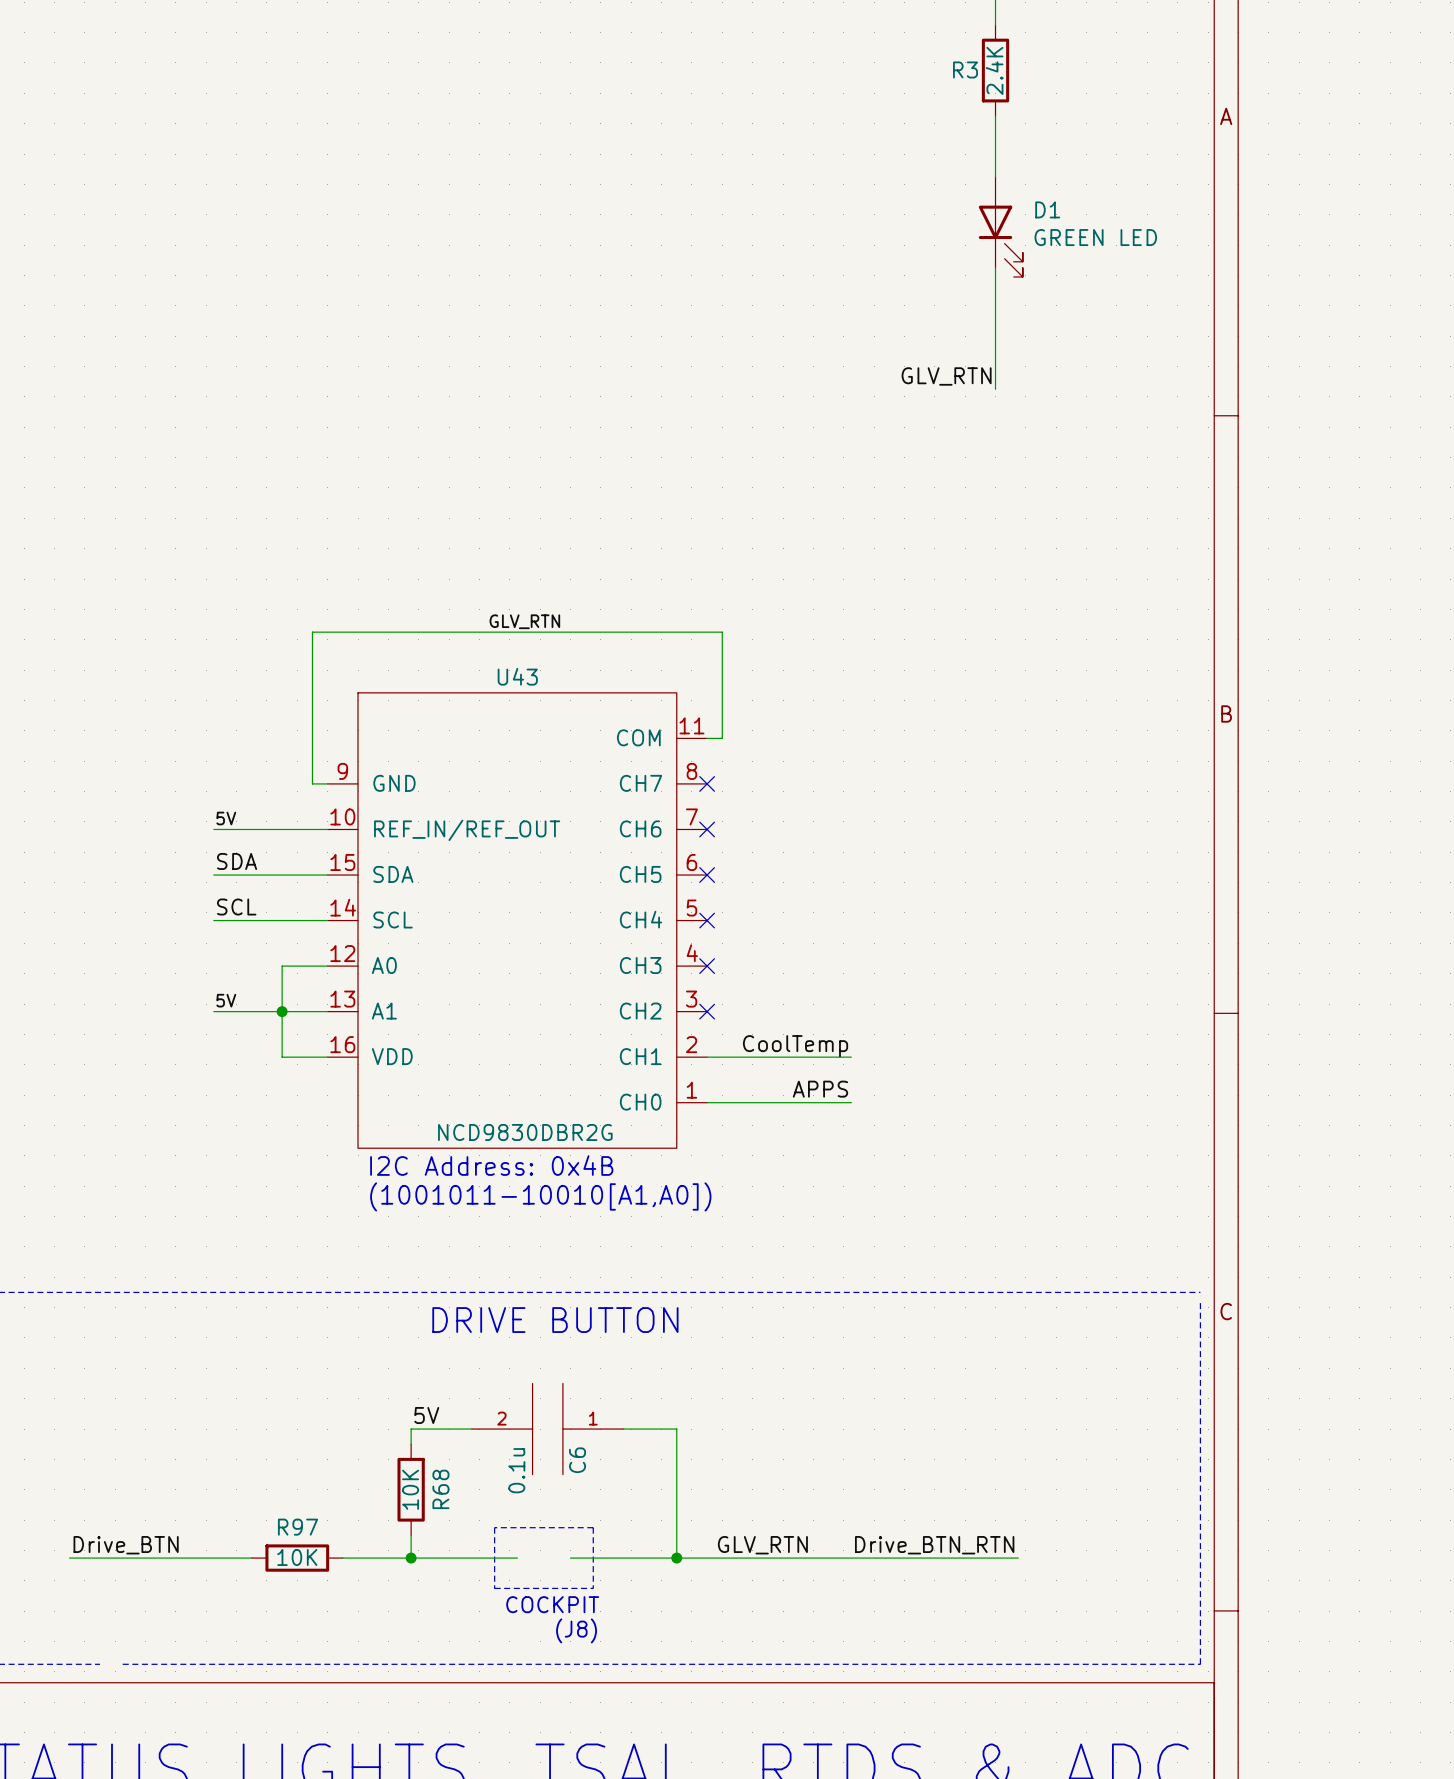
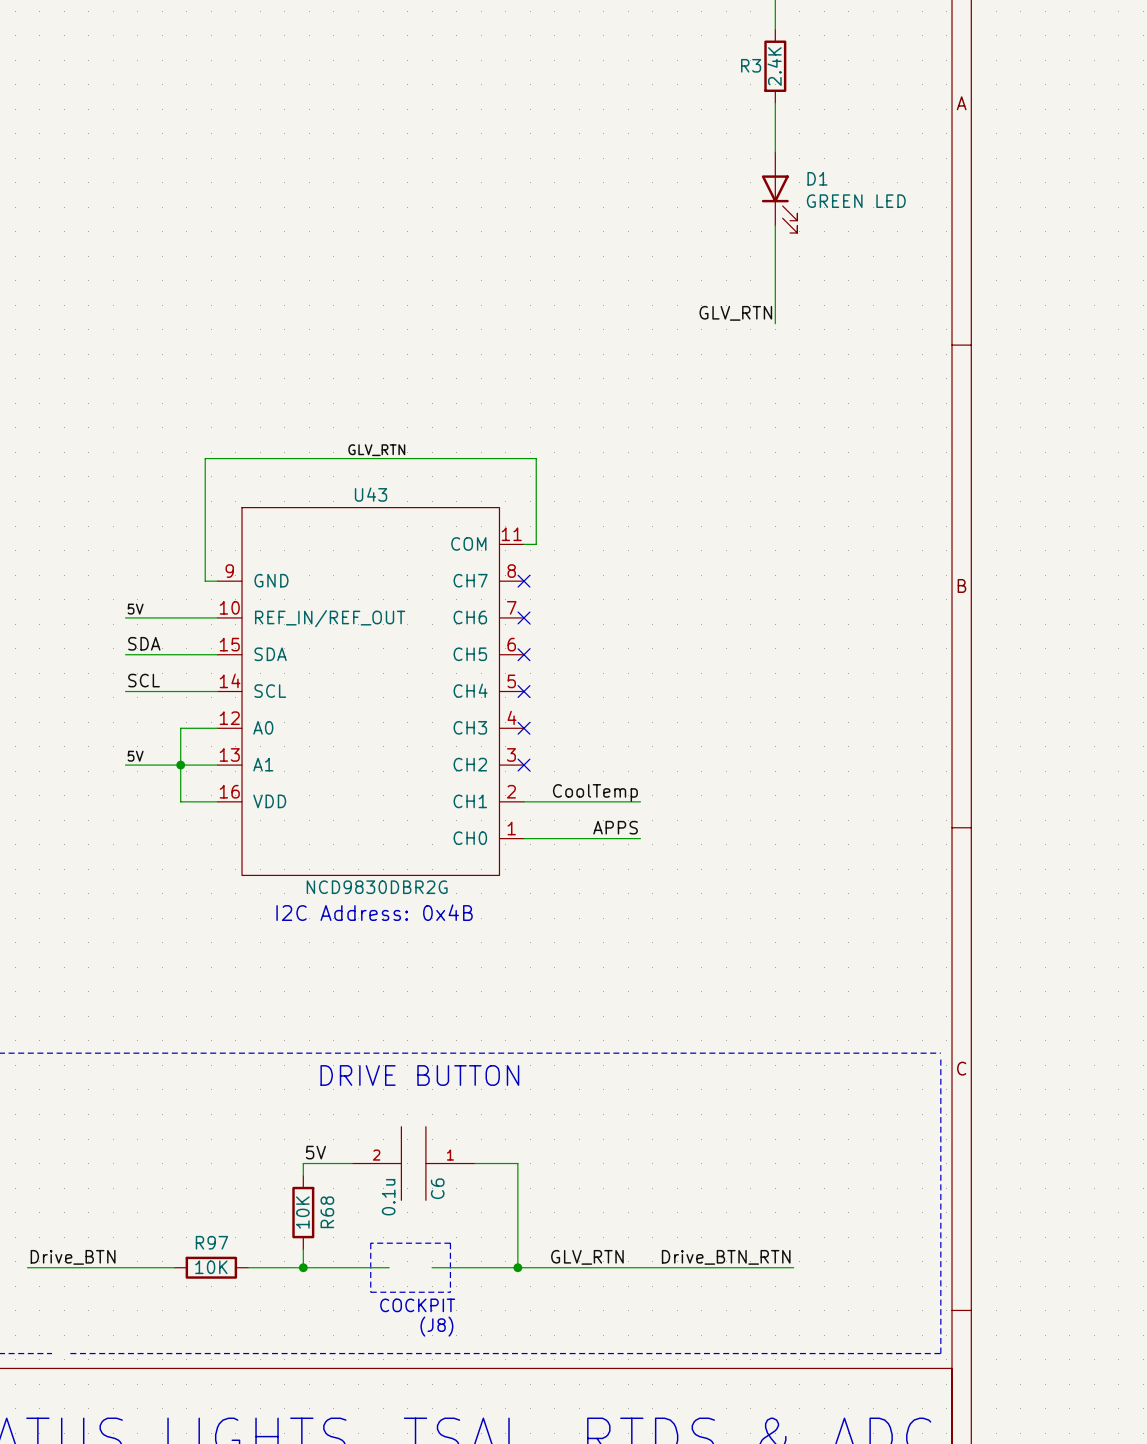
label position: GLV_RTN (524, 621) -> GLV_RTN (376, 450)
no-connect mark: none -> (523, 581)
wire: (707, 738) (722, 738) (722, 632) (312, 632) (312, 783) (327, 783) -> (523, 544) (536, 544) (536, 458) (205, 458) (205, 581) (217, 581)
label: none -> 5V (135, 609)
no-connect mark: none -> (523, 617)
no-connect mark: (707, 783) -> none
no-connect mark: none -> (523, 654)
label: 5V (226, 818) -> none
wire: (213, 829) (327, 829) -> (125, 617) (217, 617)
no-connect mark: (707, 829) -> none
no-connect mark: none -> (523, 691)
label position: SDA (237, 861) -> SDA (144, 643)
wire: (213, 875) (327, 875) -> (125, 654) (217, 654)
no-connect mark: (707, 875) -> none
no-connect mark: none -> (523, 728)
label position: SCL (236, 907) -> SCL (144, 680)
wire: (213, 920) (327, 920) -> (125, 691) (217, 691)
U43 position: (517, 920) -> (370, 691)
no-connect mark: (707, 920) -> none
label: none -> 5V (135, 756)
junction: none -> (180, 765)
no-connect mark: none -> (523, 765)
wire: (327, 966) (282, 966) (282, 1057) (327, 1057) -> (217, 728) (180, 728) (180, 801) (217, 801)
no-connect mark: (707, 966) -> none
label: 5V (226, 1000) -> none
wire: (213, 1011) (327, 1011) -> (125, 765) (217, 765)
junction: (282, 1011) -> none
no-connect mark: (707, 1011) -> none
label position: CoolTemp (795, 1046) -> CoolTemp (595, 792)
wire: (707, 1057) (851, 1057) -> (523, 801) (640, 801)
label position: APPS (820, 1089) -> APPS (615, 827)
wire: (707, 1102) (851, 1102) -> (523, 838) (640, 838)
U43 value position: NCD9830DBR2G (525, 1132) -> NCD9830DBR2G (377, 887)
text position: I2C Address: 0x4B (491, 1165) -> I2C Address: 0x4B (374, 912)
text: (1001011-10010[A1,A0]) (540, 1196) -> none

